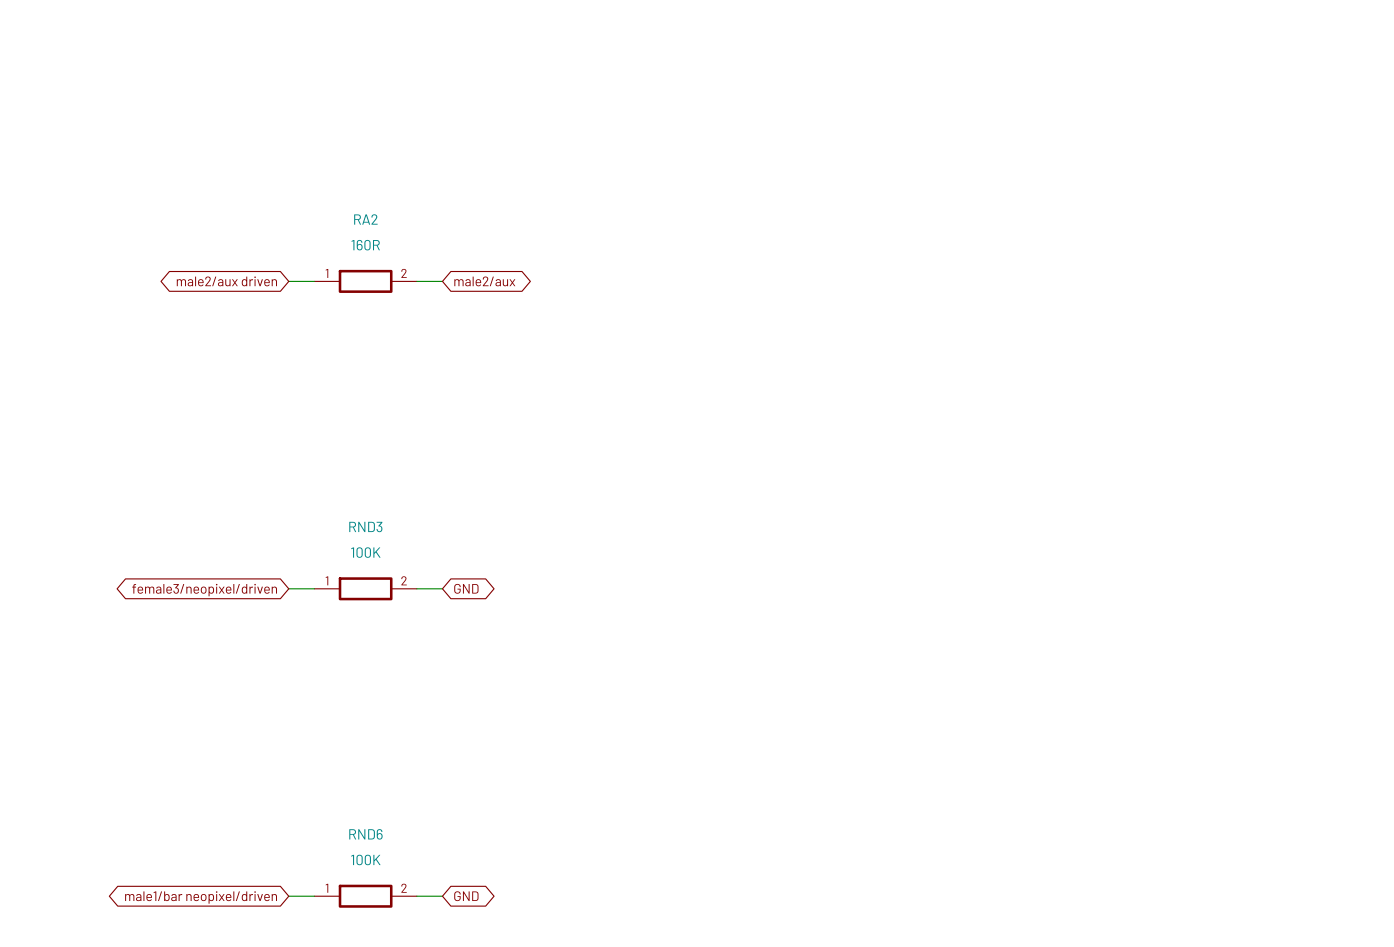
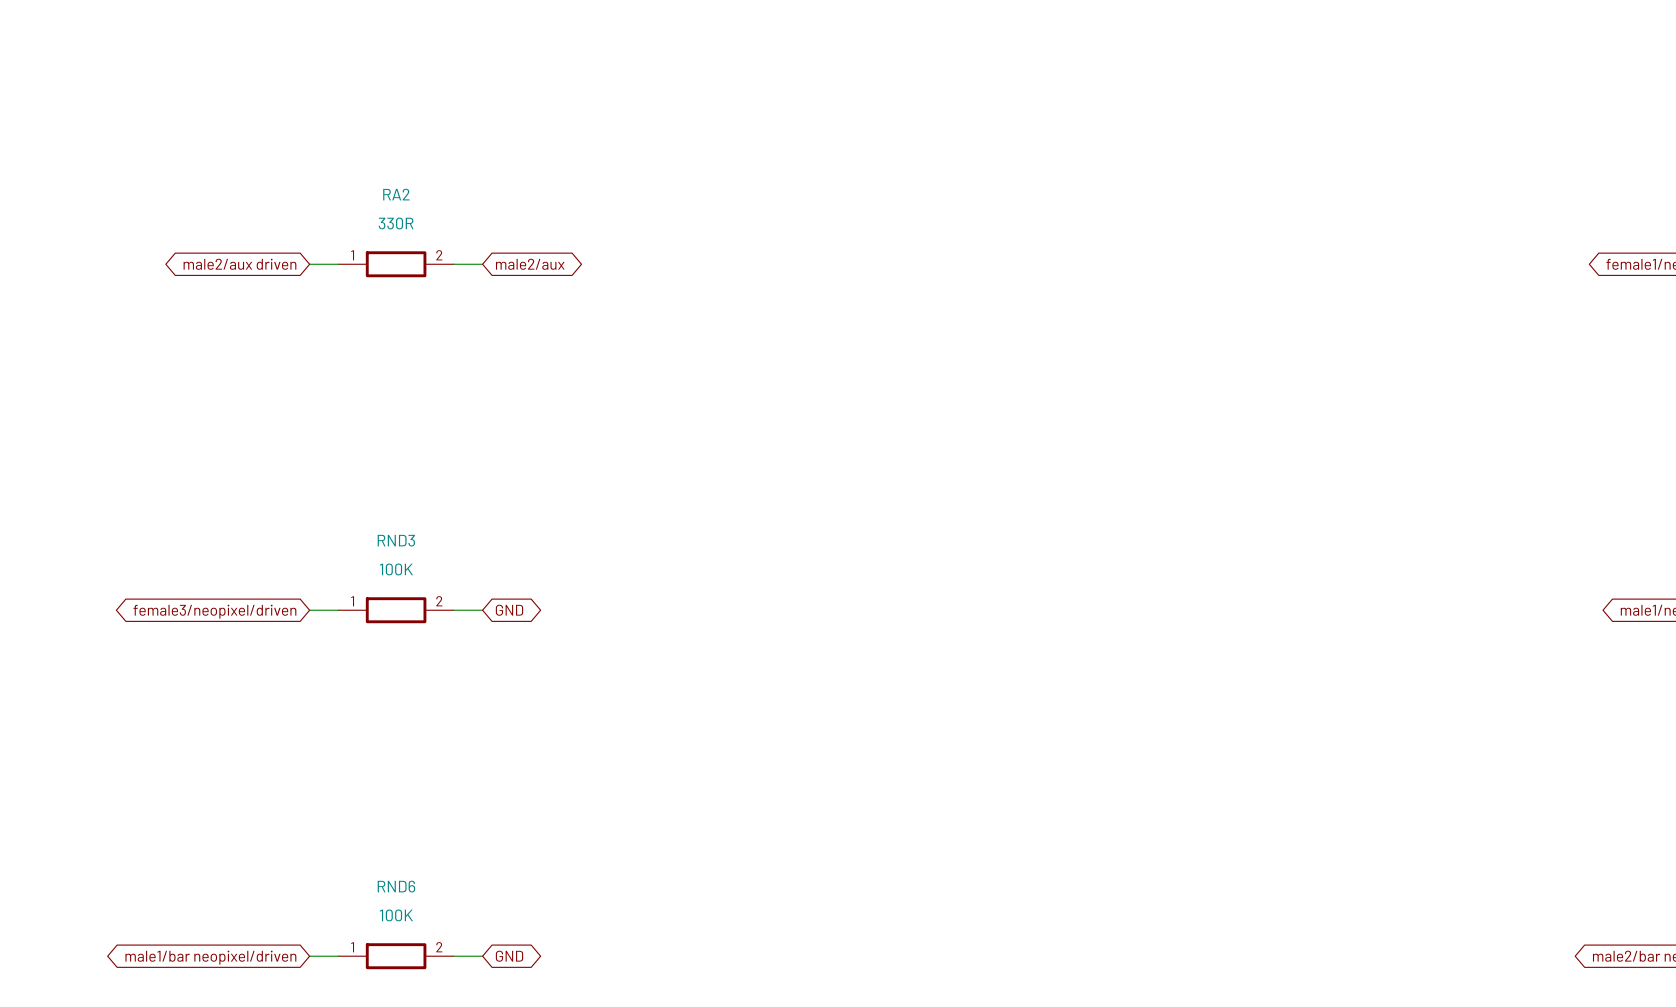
RA2 value: 160R (365, 245) -> 330R (396, 223)

